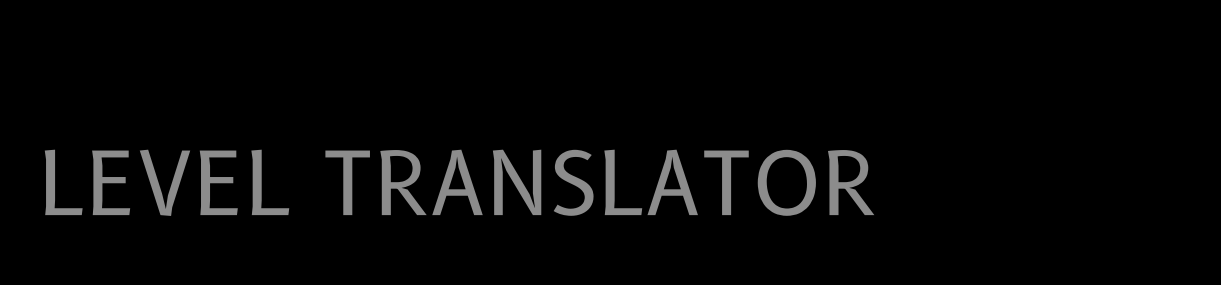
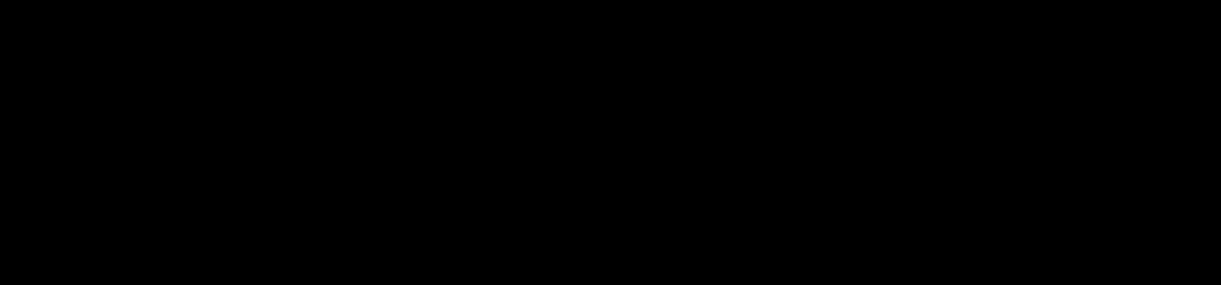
text: LEVEL TRANSLATOR (459, 182) -> none

